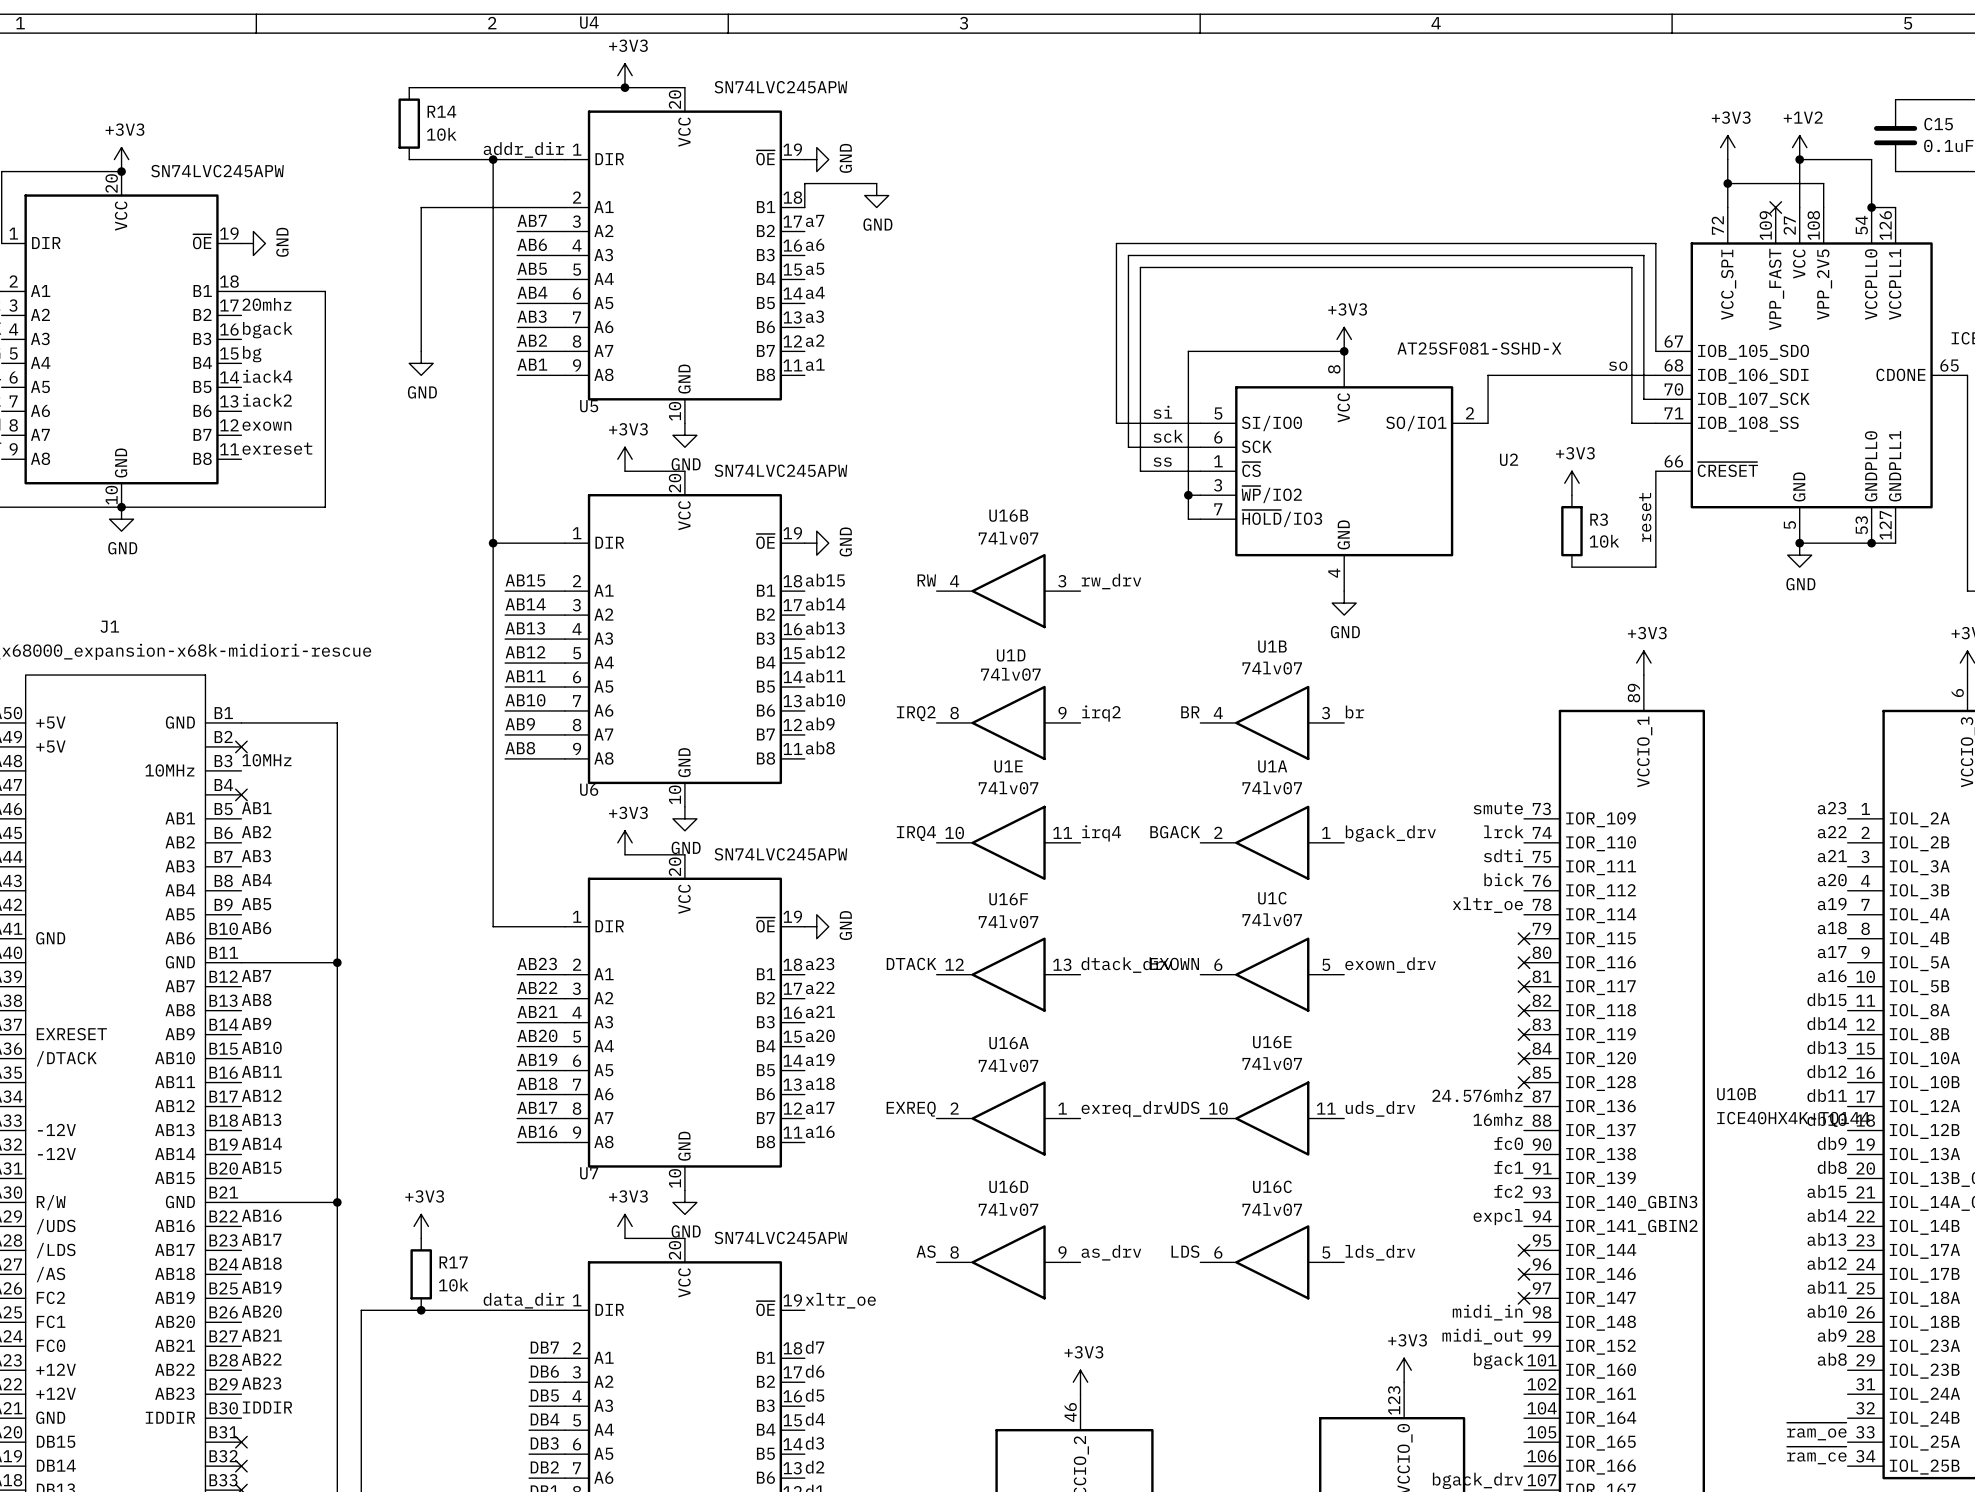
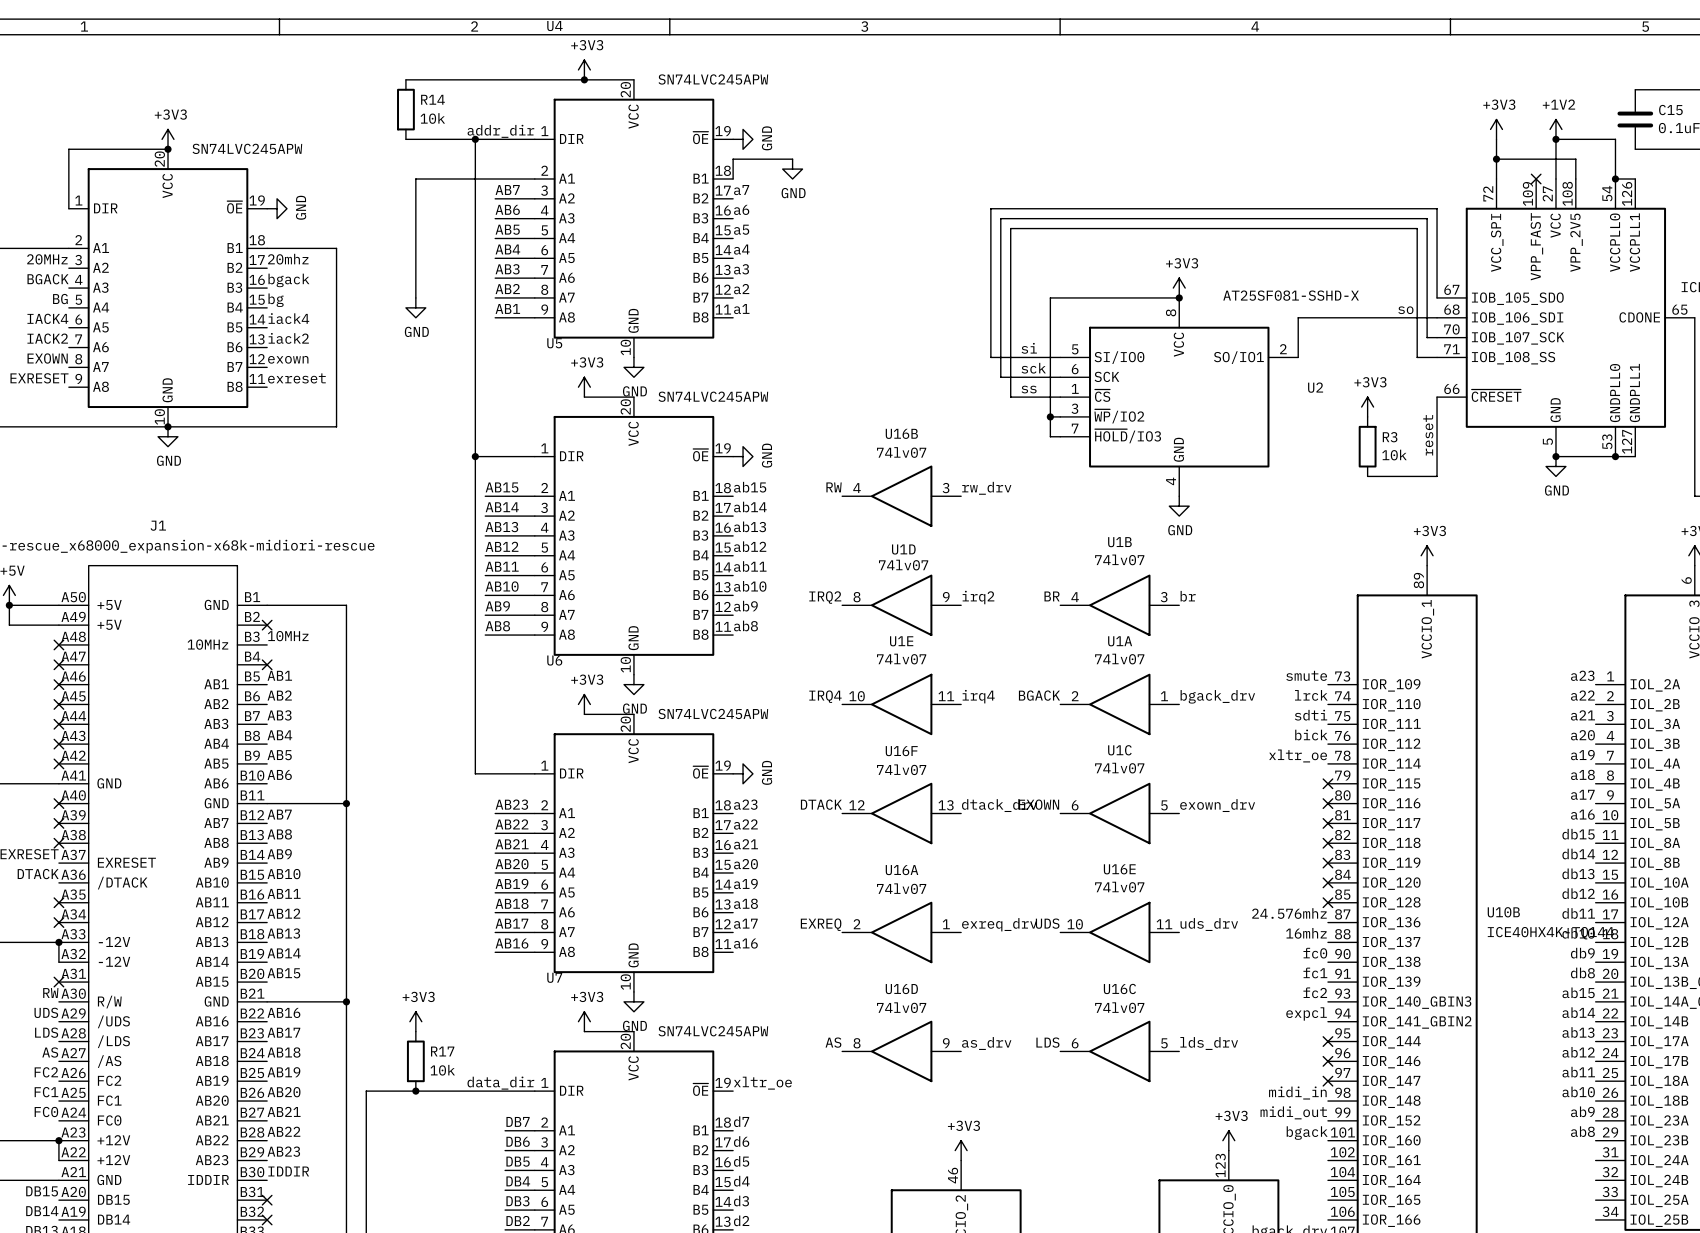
label: ~{ram_oe} (1816, 1431) -> none
label: ~{ram_ce} (1816, 1455) -> none

